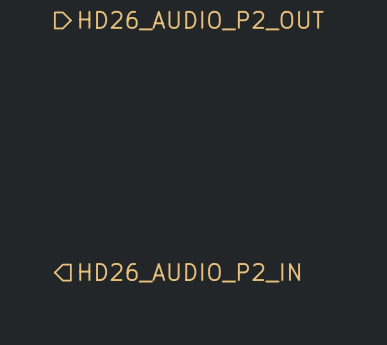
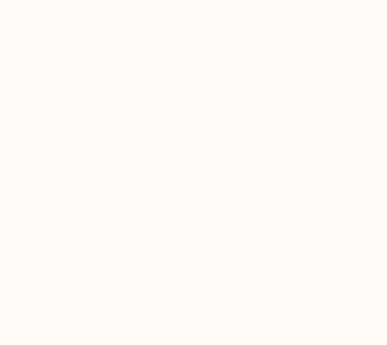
hierarchical label: HD26_AUDIO_P2_OUT (201, 20) -> none
hierarchical label: HD26_AUDIO_P2_IN (189, 272) -> none

